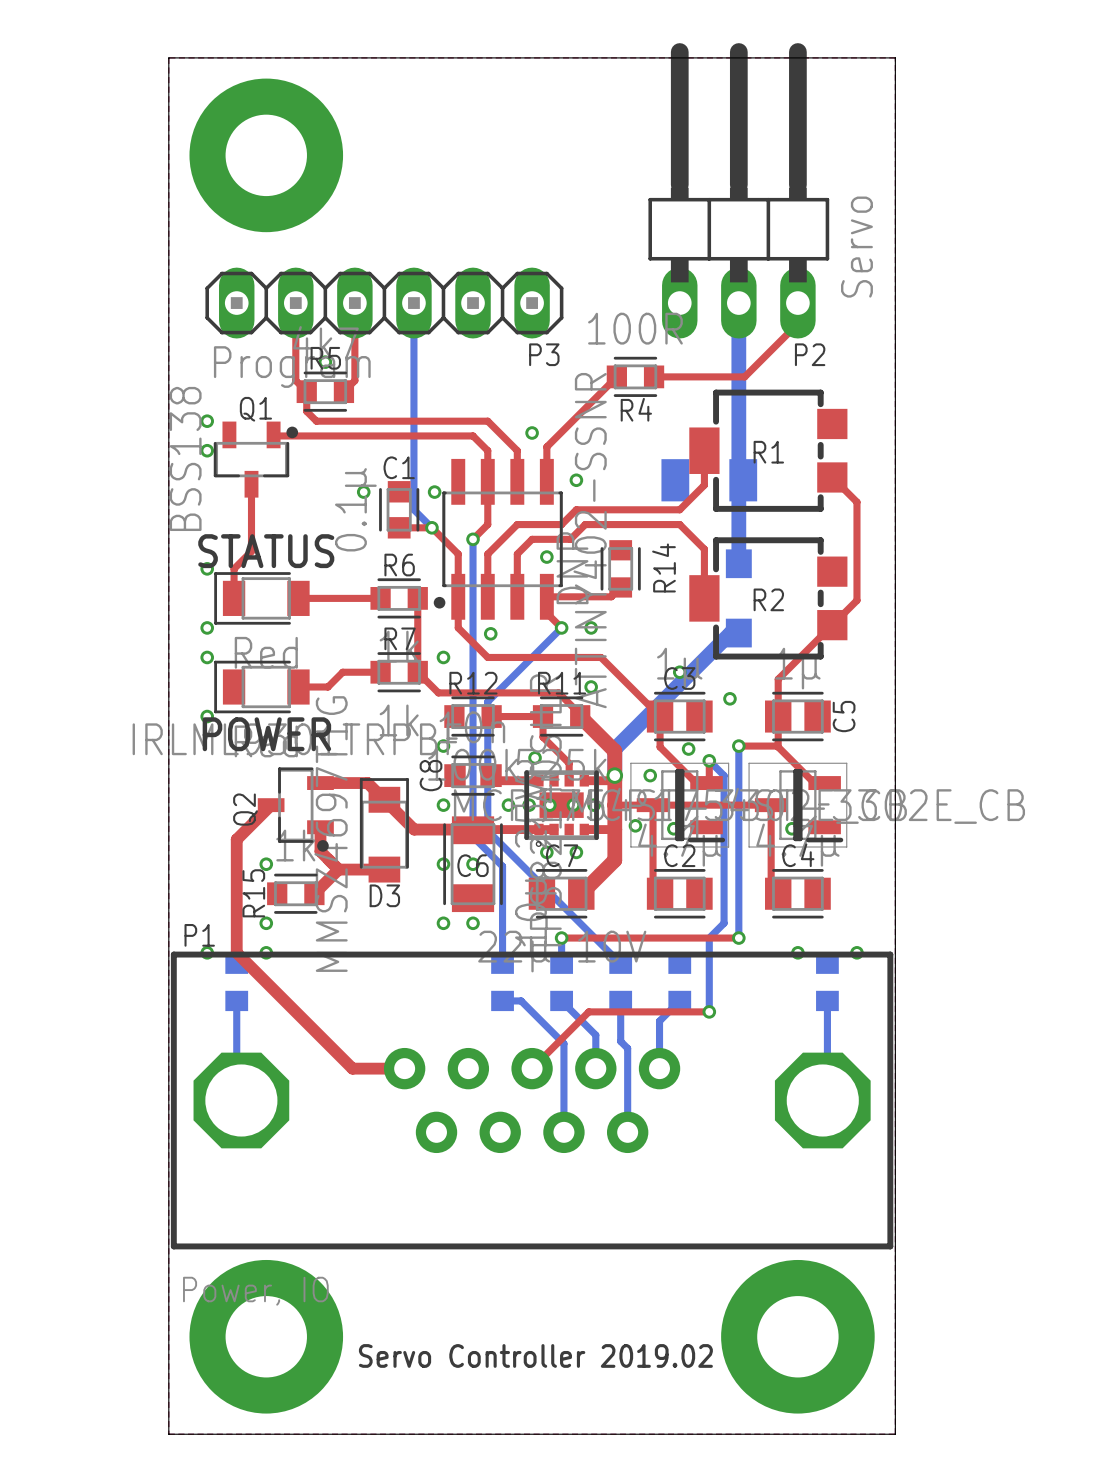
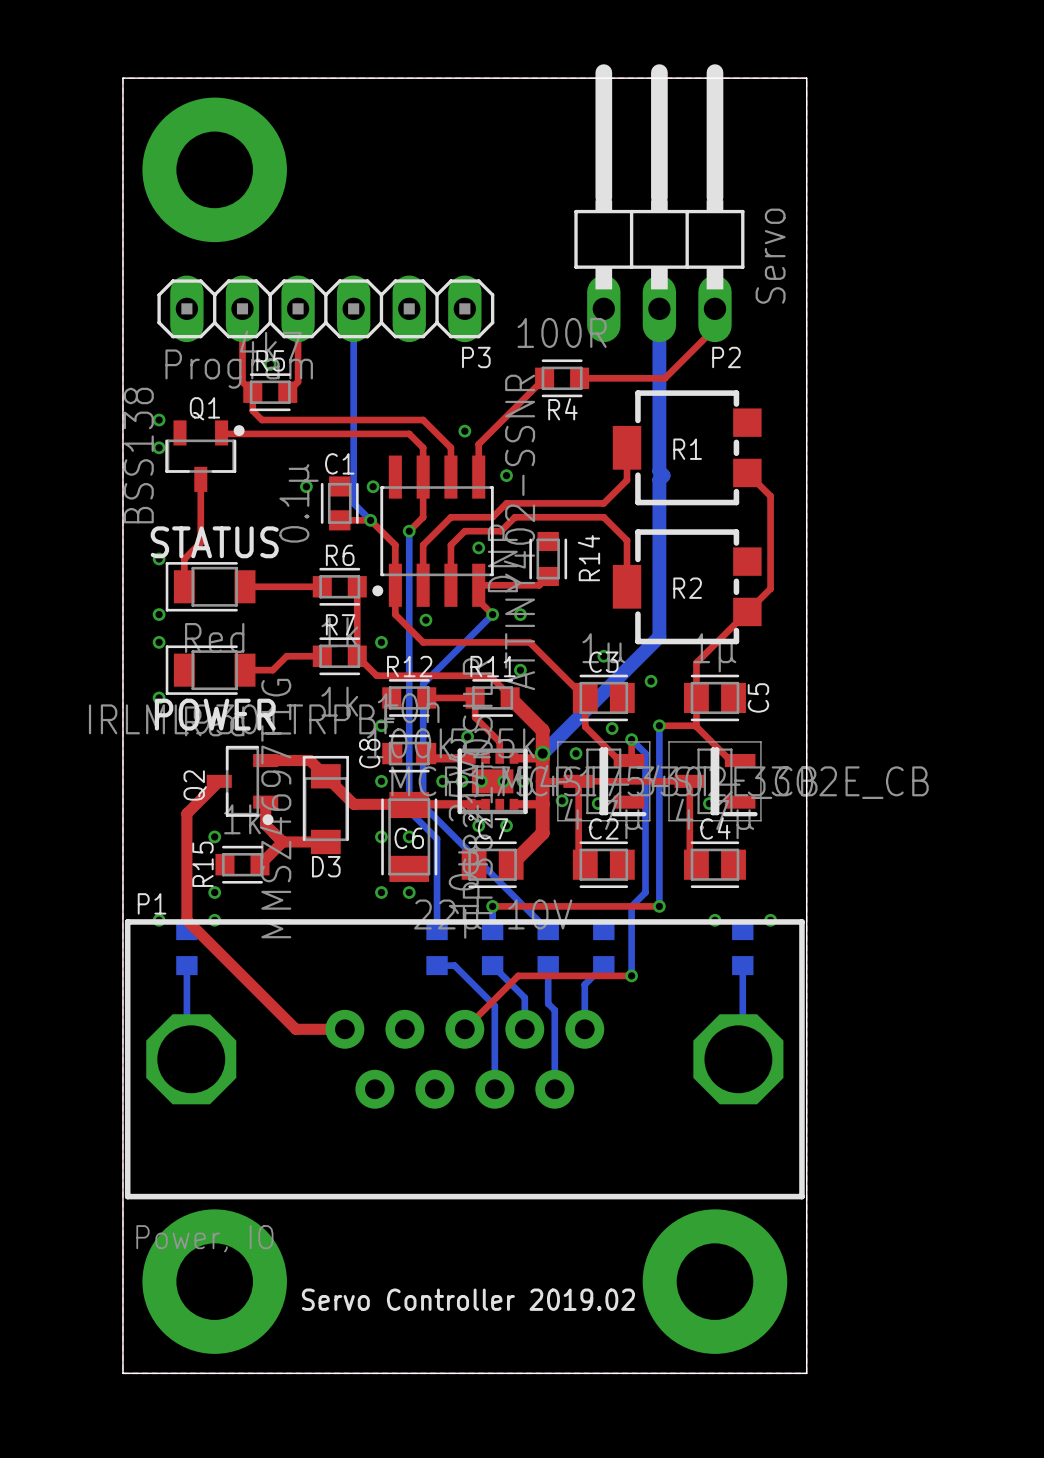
part: (709, 480) -> none
part: (738, 598) -> none
bottom track: (738, 633) (730, 633) (614, 749) (614, 775) -> (659, 554) (659, 636) (542, 753)

